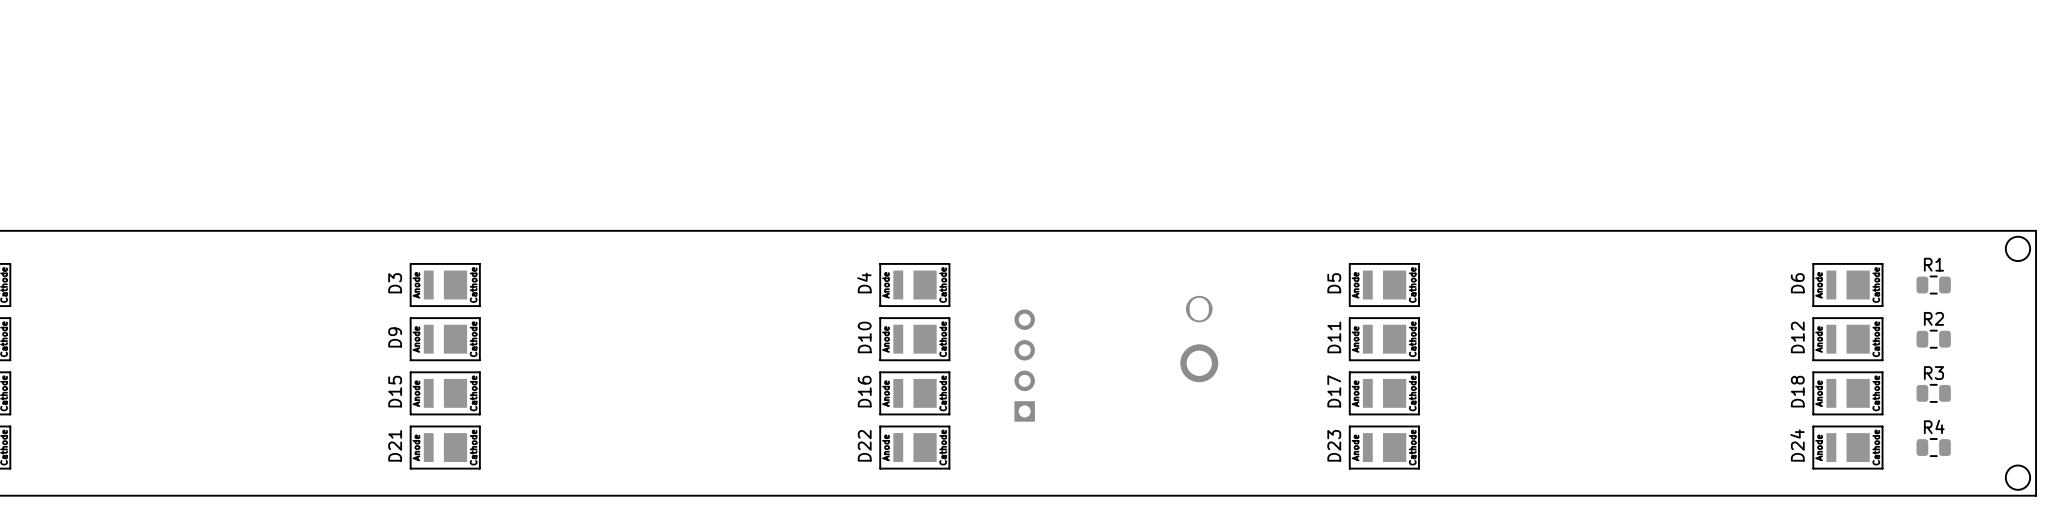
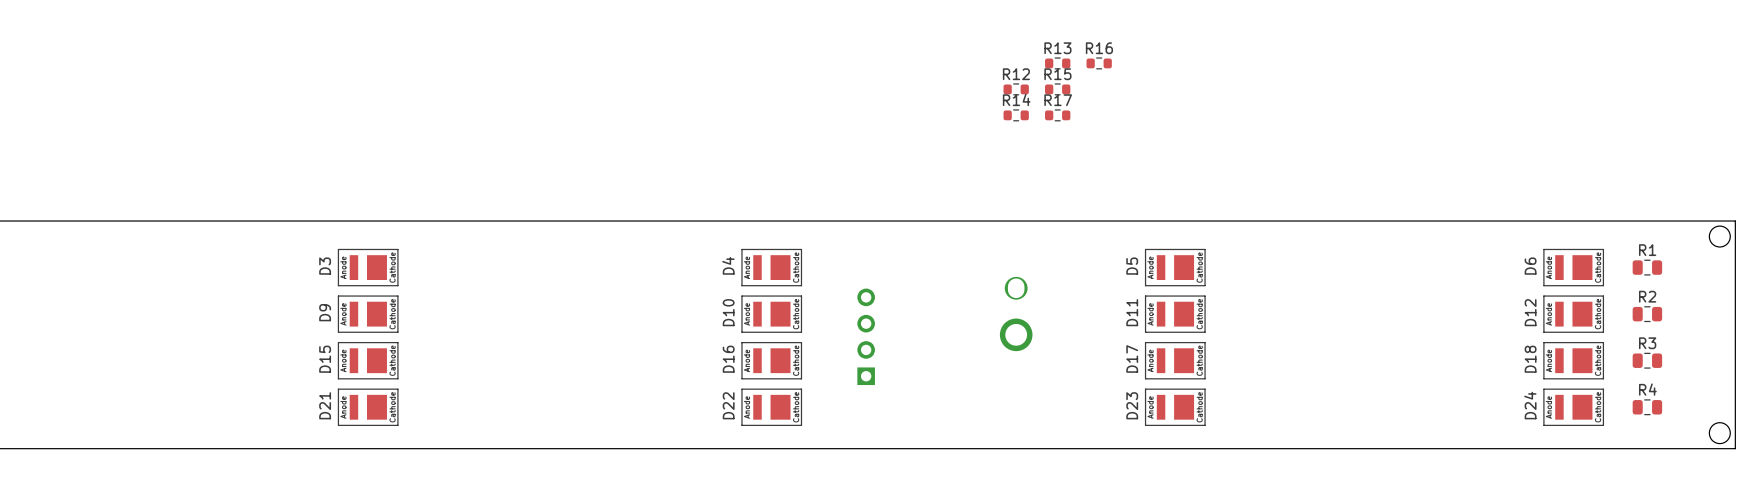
R13: none -> (1057, 63)
R16: none -> (1099, 63)
R12: none -> (1016, 89)
R15: none -> (1057, 89)
R14: none -> (1016, 115)
R17: none -> (1057, 115)

